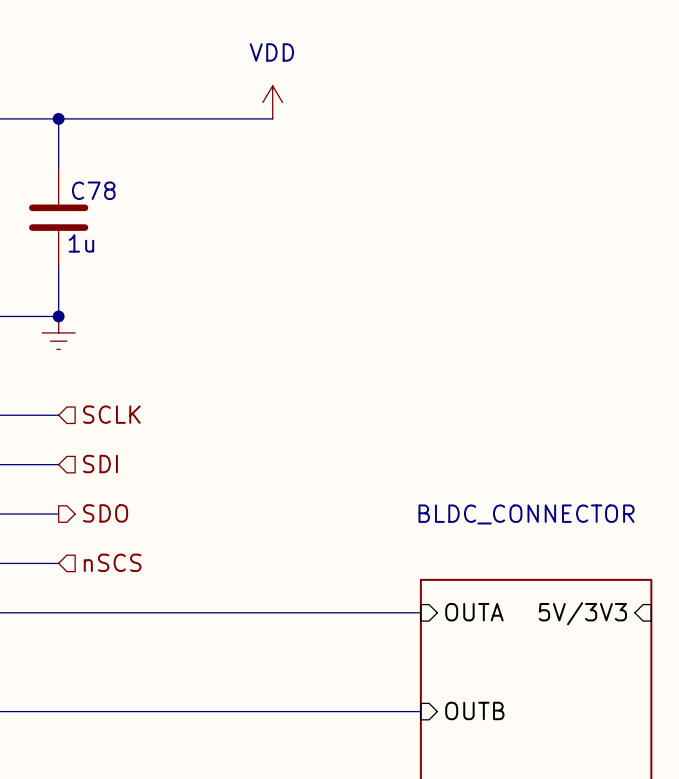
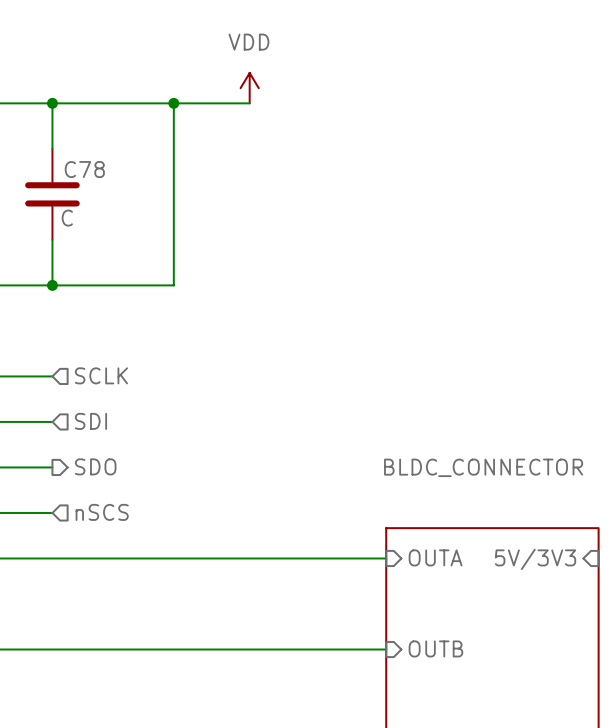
wire: none -> (173, 103) (173, 285) (52, 285)
junction: none -> (173, 103)
C78 value: 1u (81, 243) -> C (67, 218)
power symbol: (58, 332) -> none

